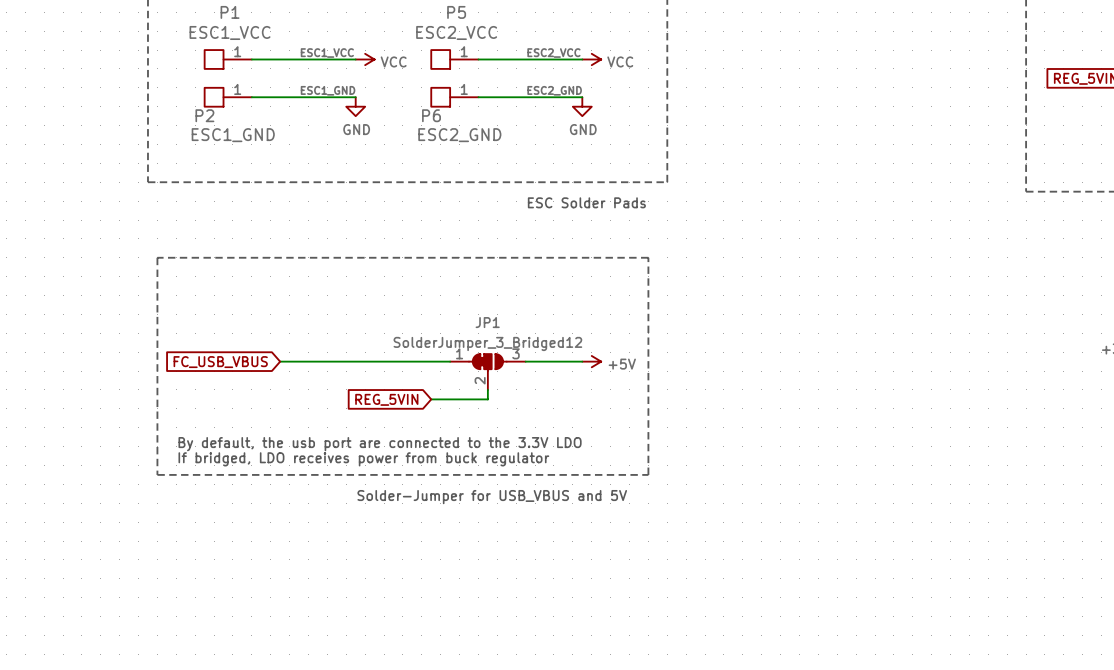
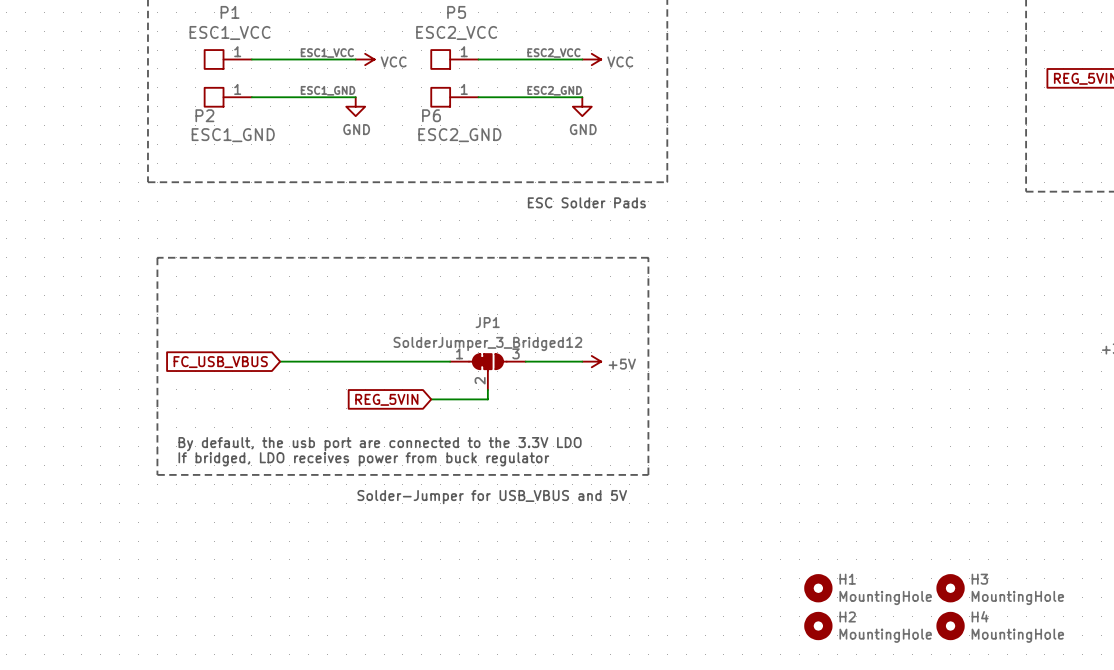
H1: none -> MountingHole (818, 588)
H3: none -> MountingHole (950, 588)
H2: none -> MountingHole (818, 626)
H4: none -> MountingHole (950, 626)

